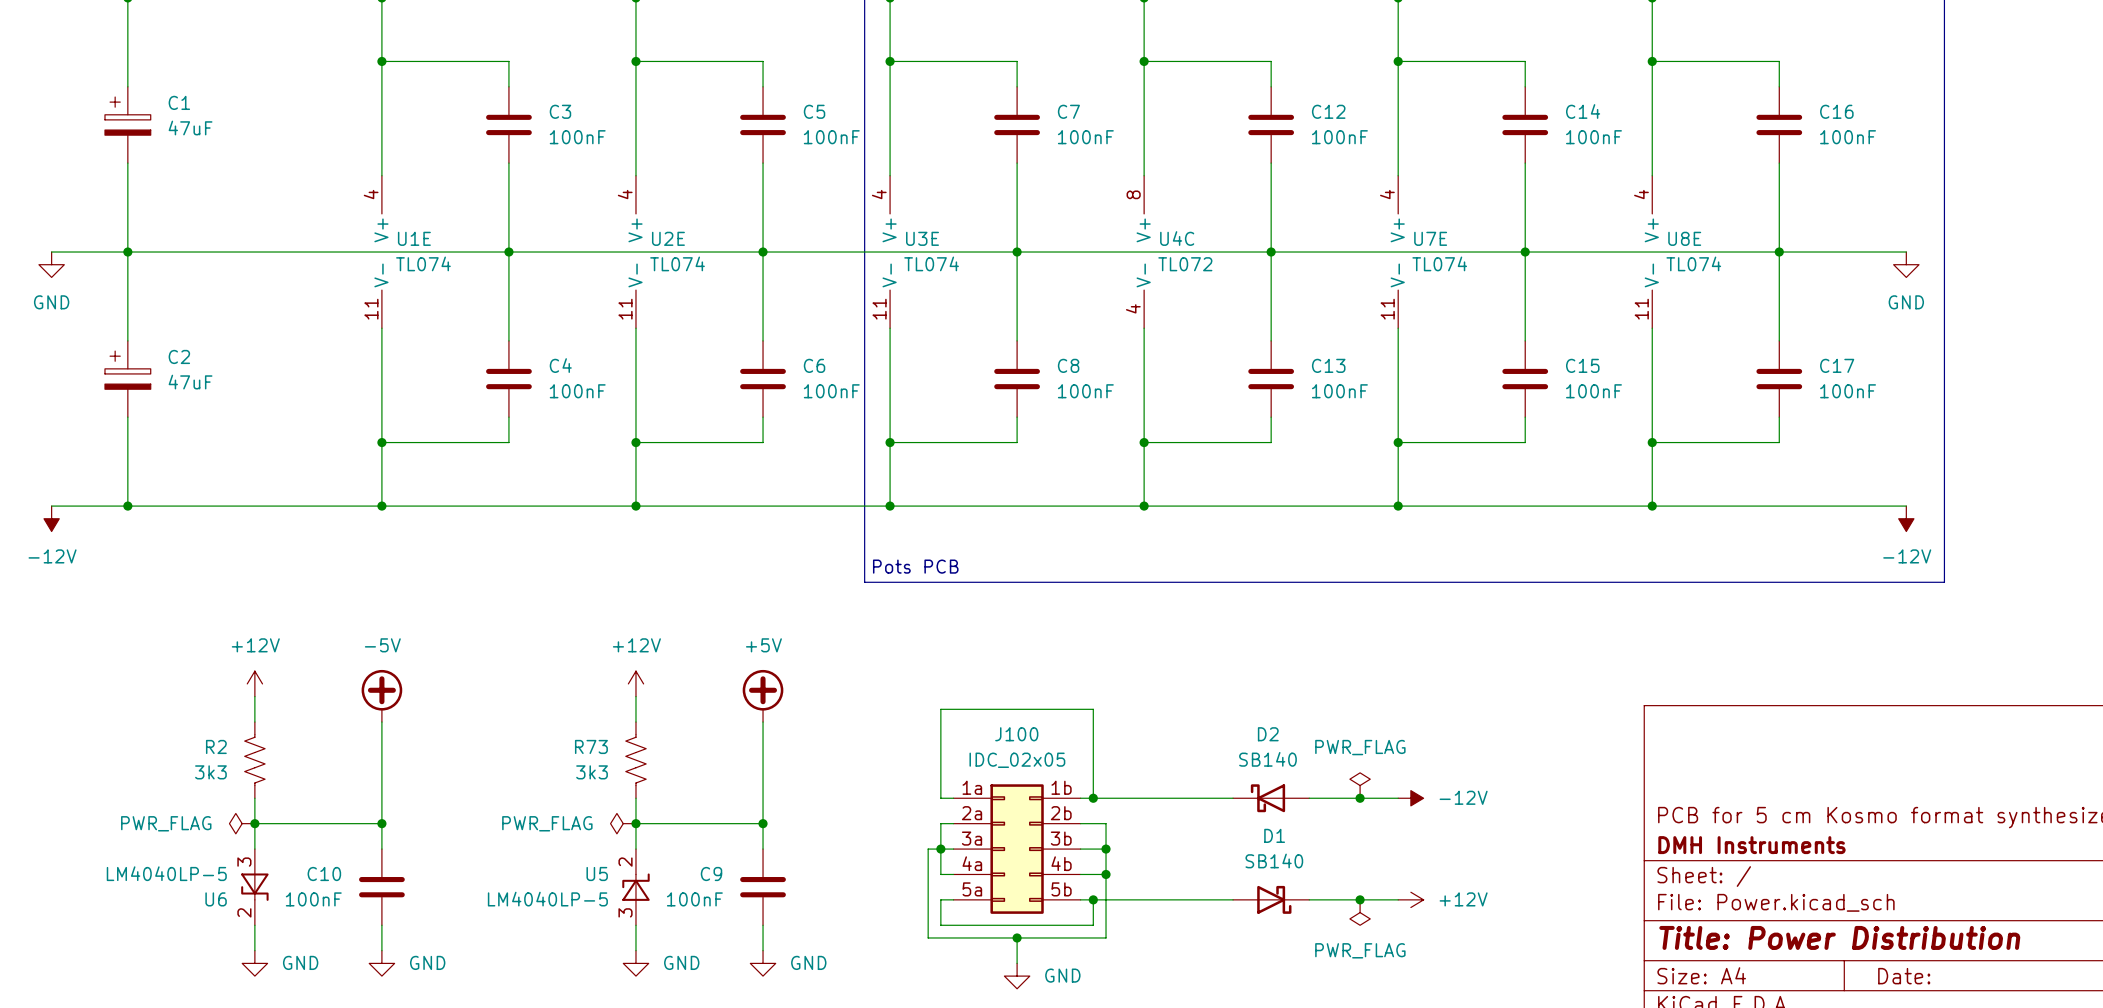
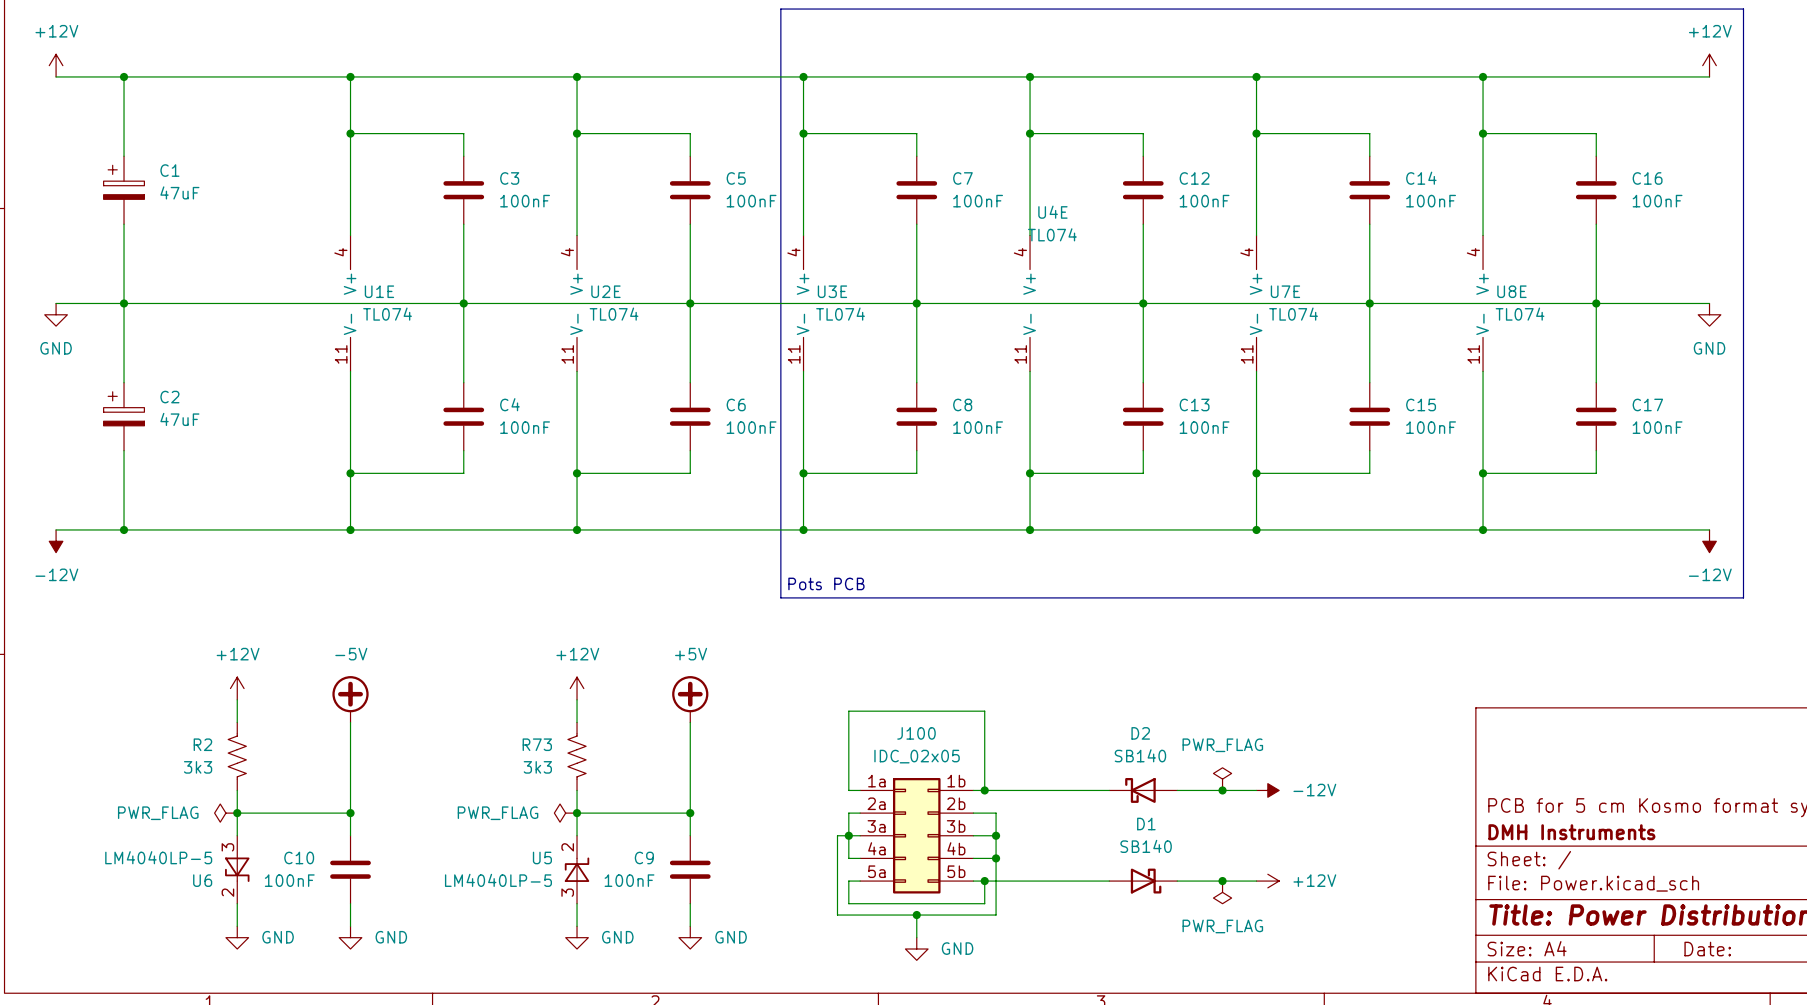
U4C pin number: 8 (1133, 194) -> 4 (1020, 252)
U4C name: U4C (1177, 238) -> U4E (1052, 212)
U4C value: TL072 (1185, 264) -> TL074 (1052, 234)
U4C pin number: 4 (1133, 308) -> 11 (1020, 354)

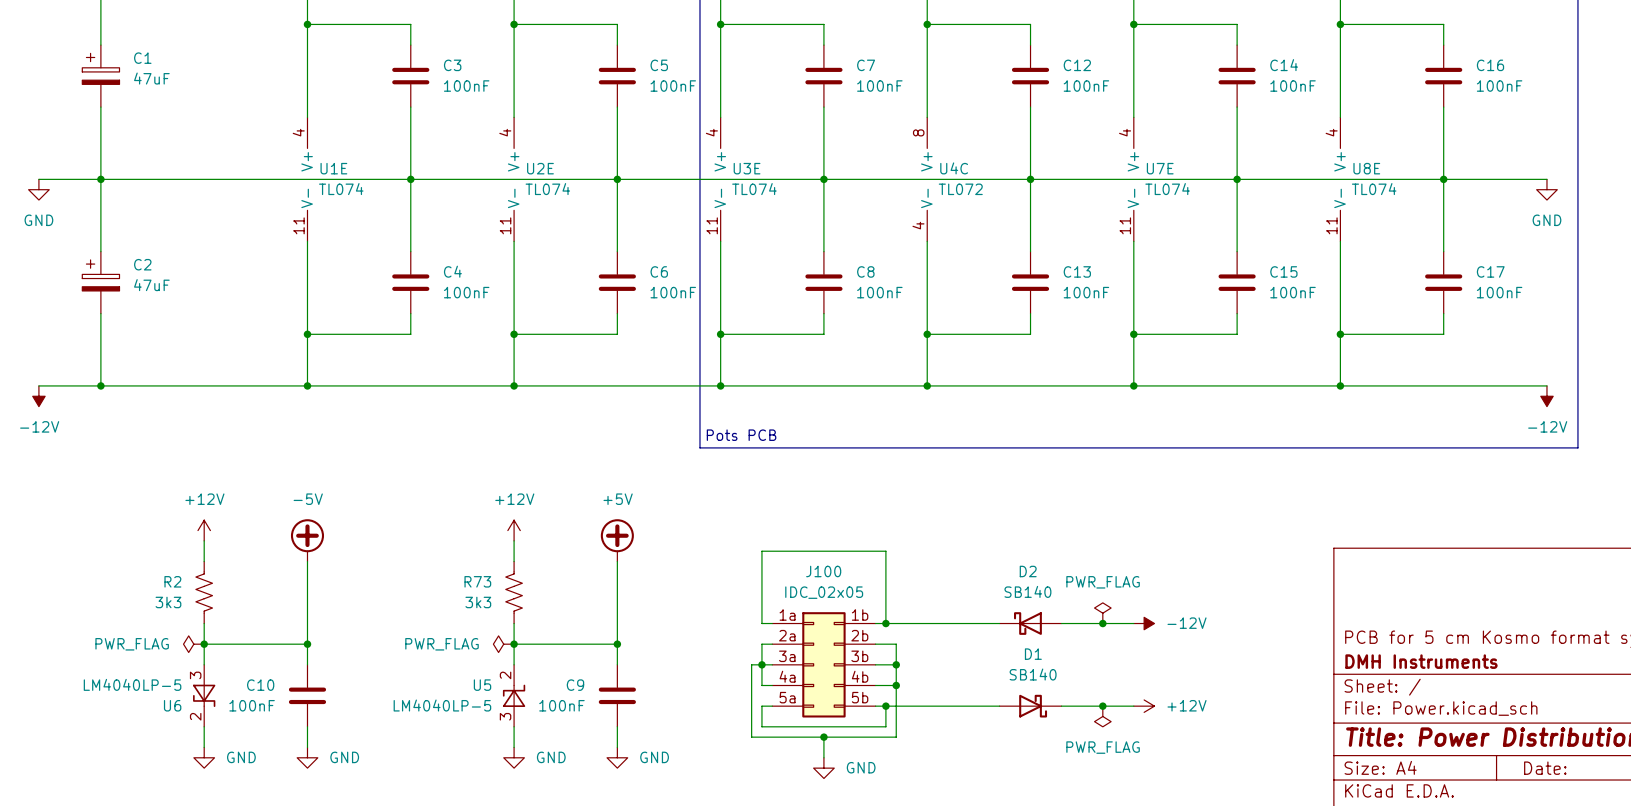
U4E name: U4E (1052, 212) -> U4C (954, 168)
U4E value: TL074 (1052, 234) -> TL072 (960, 189)
U4E pin number: 4 (1020, 252) -> 8 (918, 132)
U4E pin number: 11 (1020, 354) -> 4 (918, 225)

